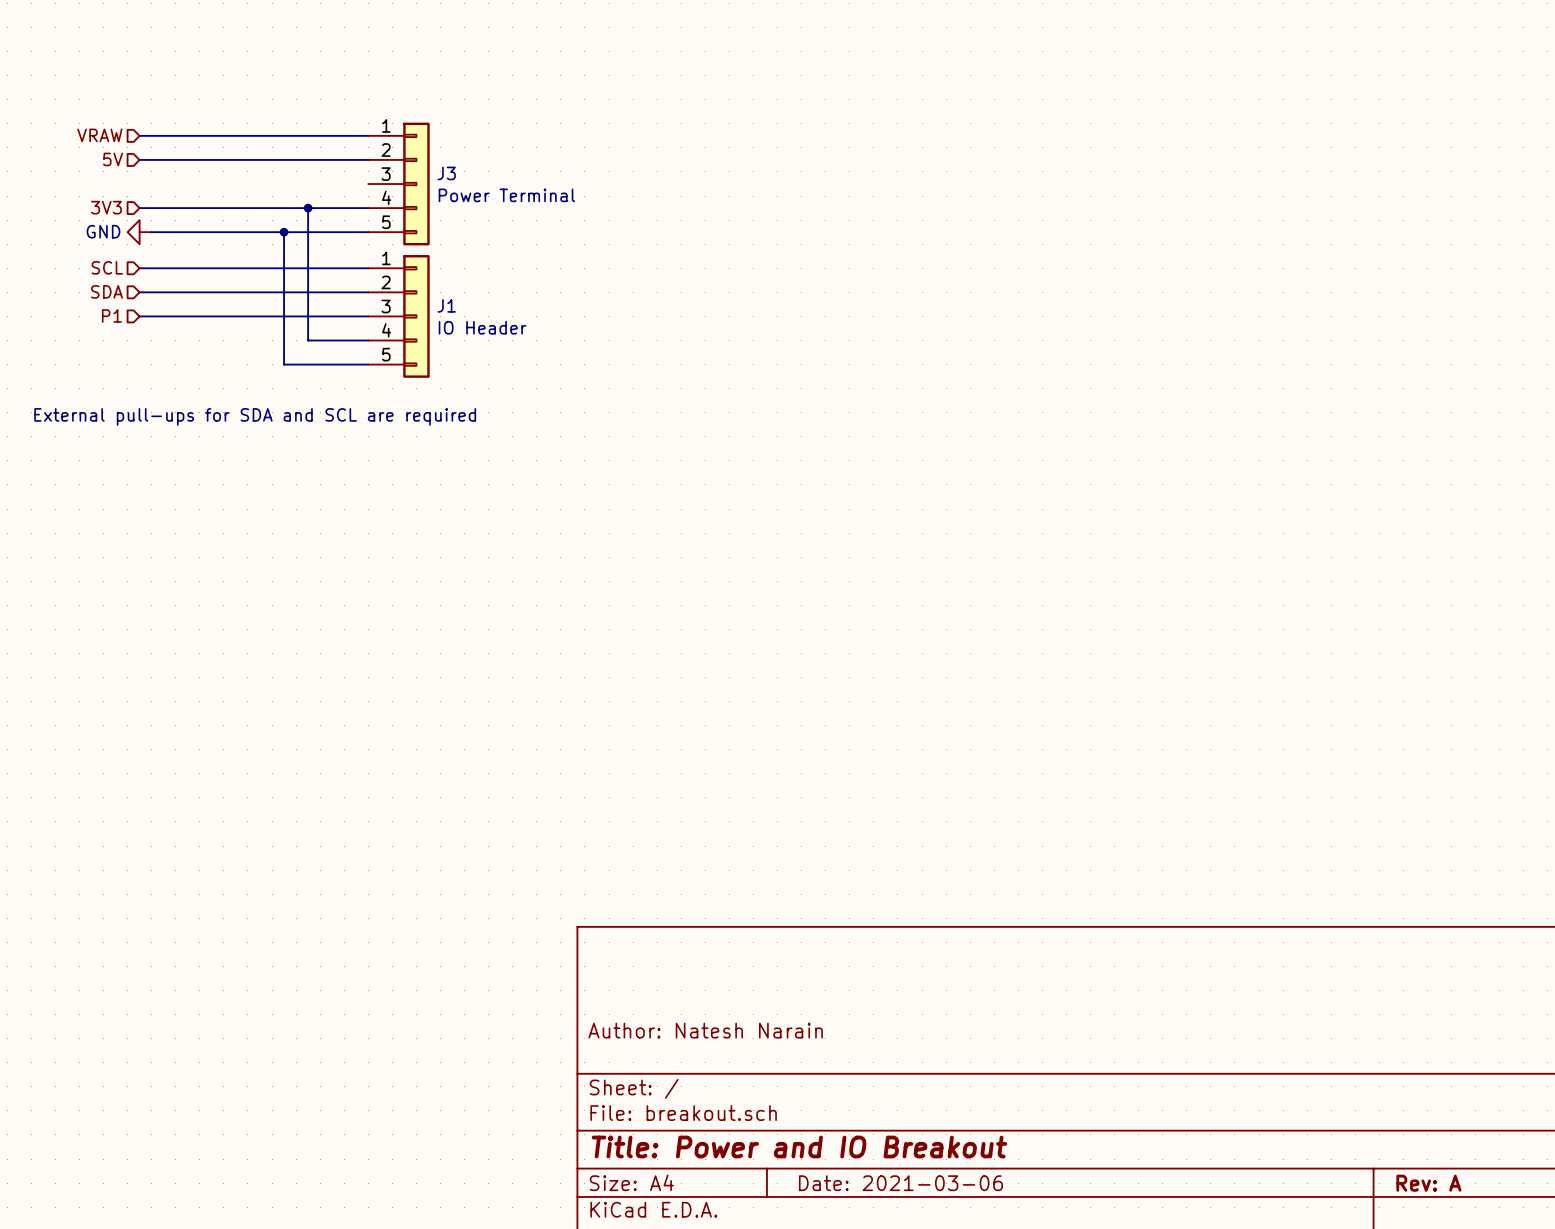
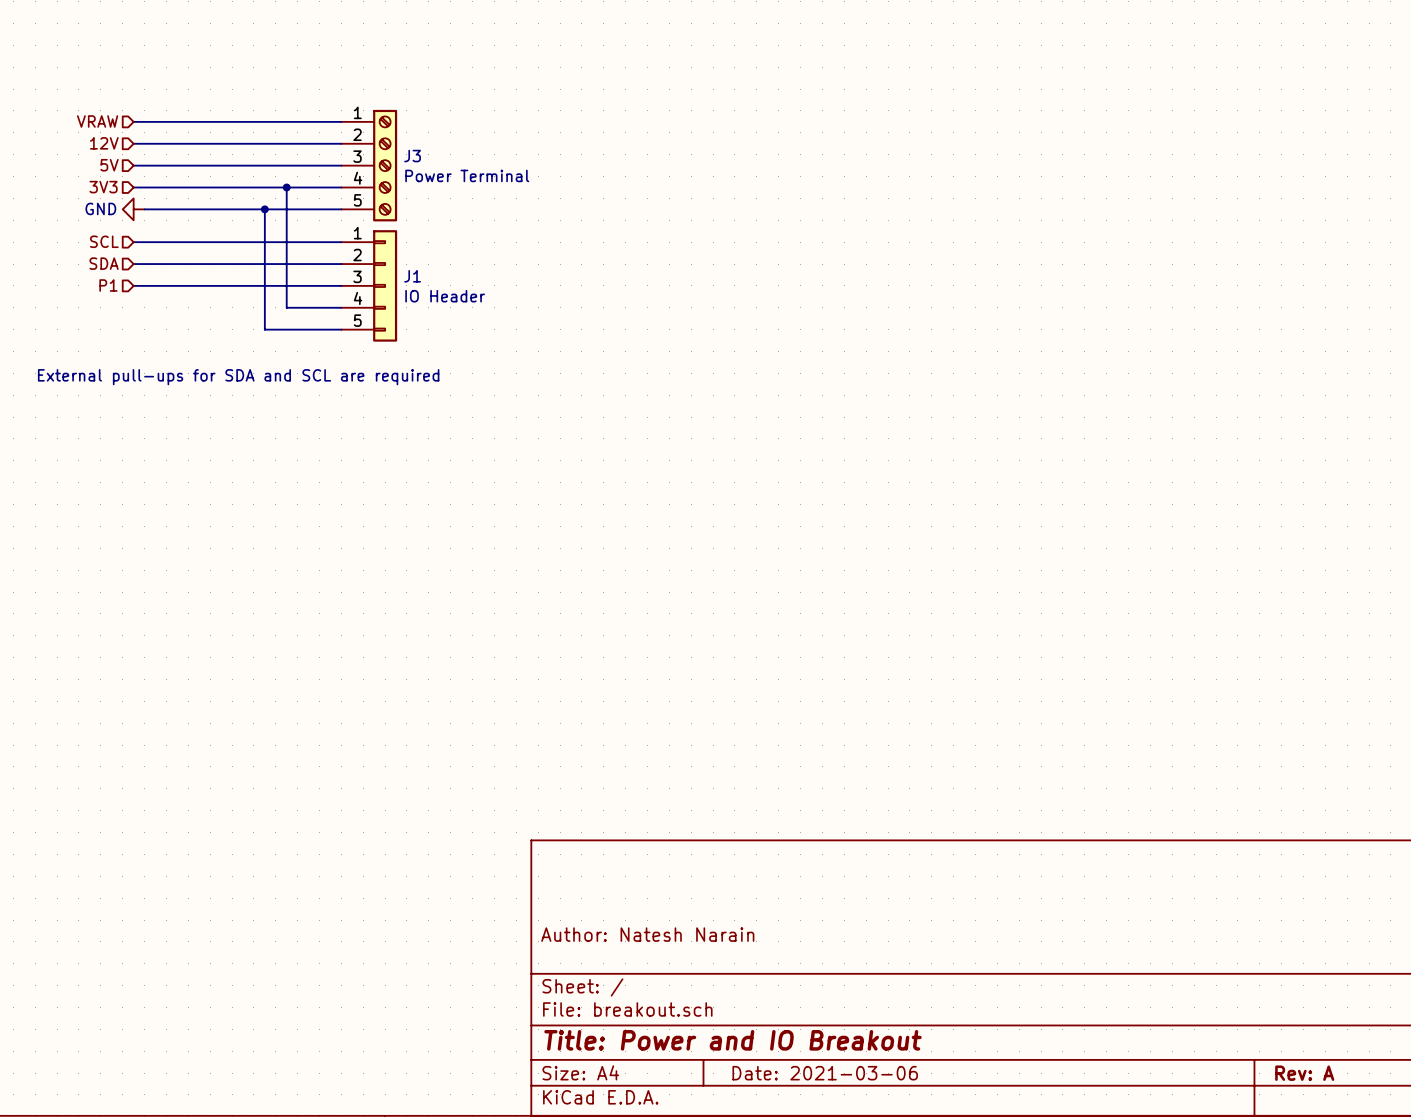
J3 symbol: [368, 122, 430, 246] -> [341, 109, 398, 222]
hierarchical label: 5V (113, 159) -> 12V (104, 143)
hierarchical label: none -> 5V (109, 165)
wire: none -> (133, 165) (341, 165)

